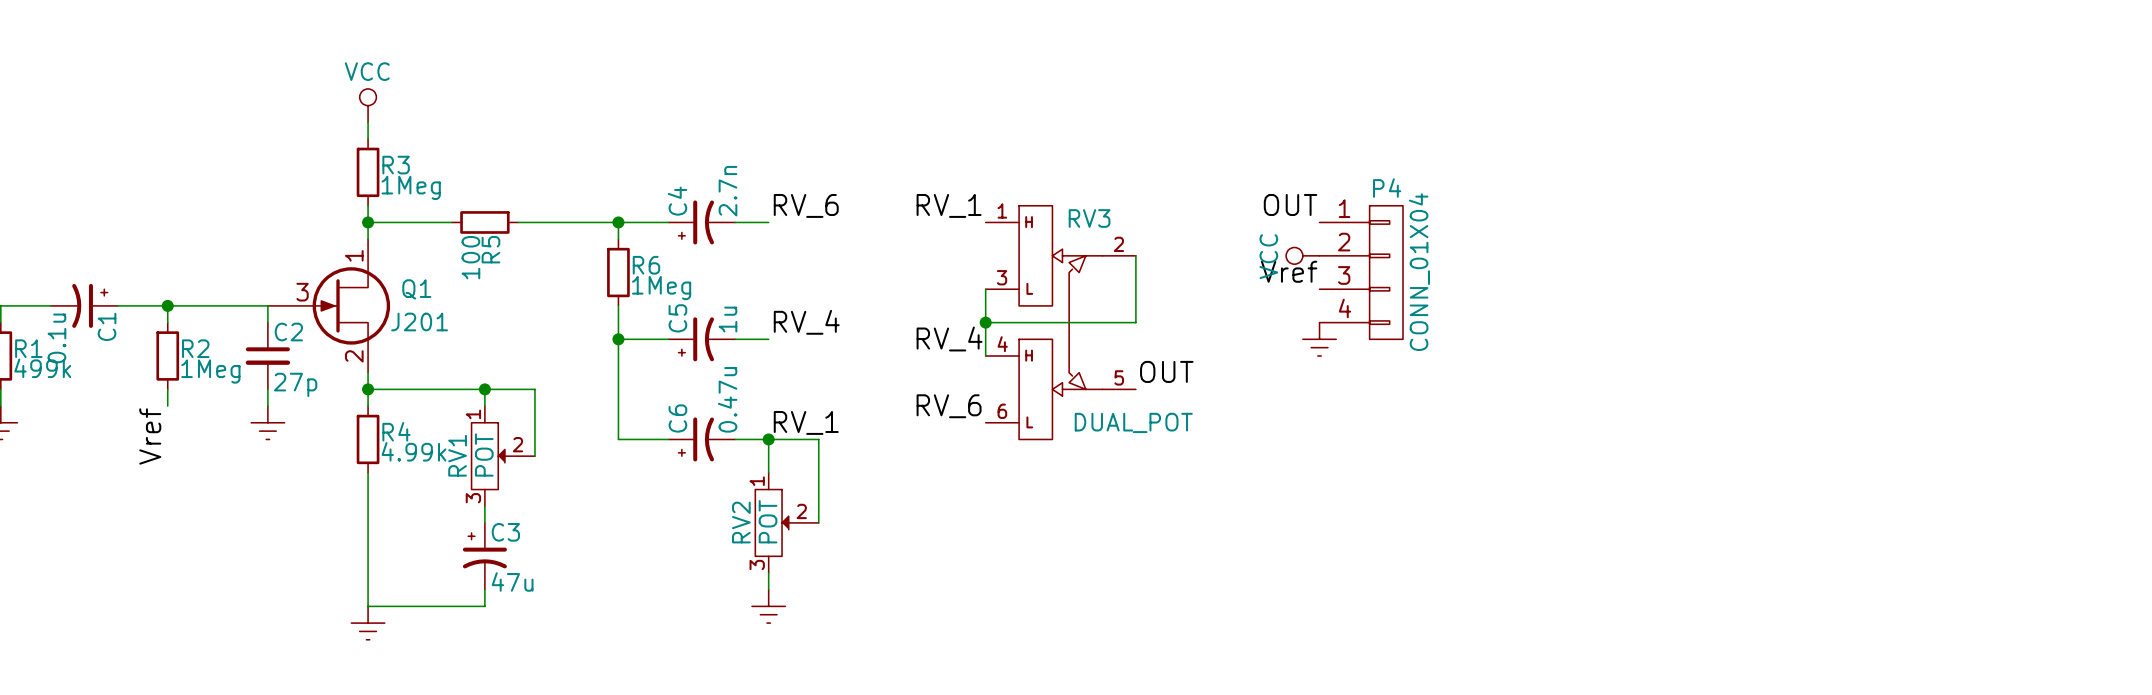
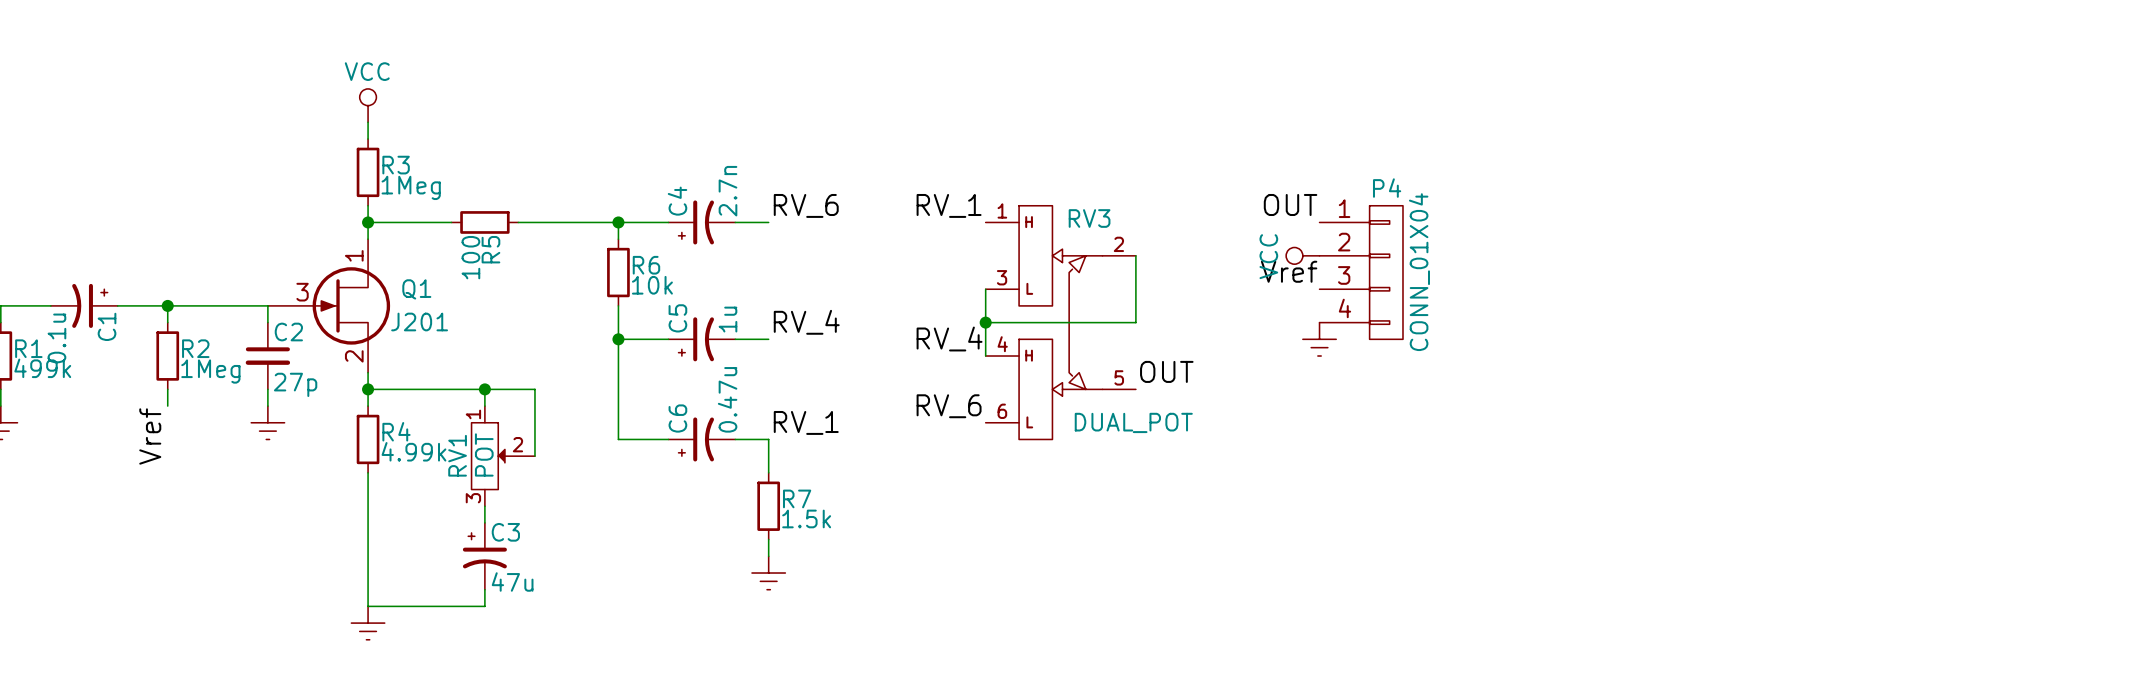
R6 value: 1Meg (661, 288) -> 10k (652, 285)
wire: (768, 439) (818, 439) (818, 522) -> none
junction: (768, 439) -> none
R7: none -> 1.5k (768, 506)
RV2: POT (787, 522) -> none
wire: (768, 573) (768, 589) -> (768, 539) (768, 556)
power symbol position: (768, 606) -> (768, 573)

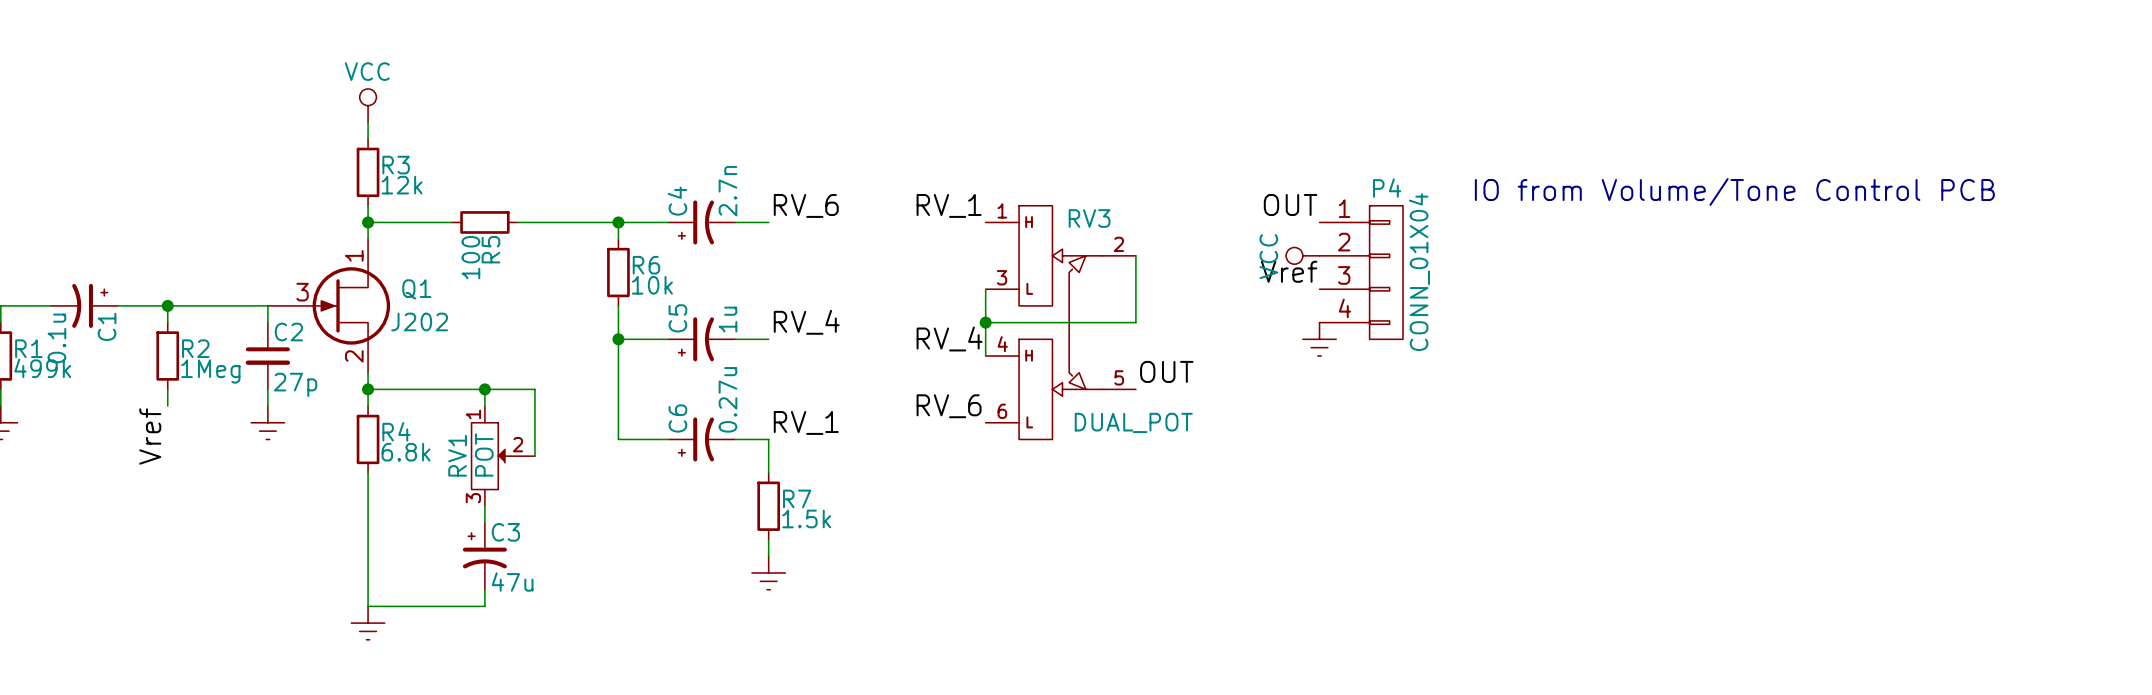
R3 value: 1Meg (411, 187) -> 12k (402, 185)
text: none -> IO from Volume/Tone Control PCB (1734, 191)
Q1 value: J201 (419, 321) -> J202 (419, 321)
C6 value: 0.47u (727, 399) -> 0.27u (727, 399)
R4 value: 4.99k (413, 451) -> 6.8k (406, 452)

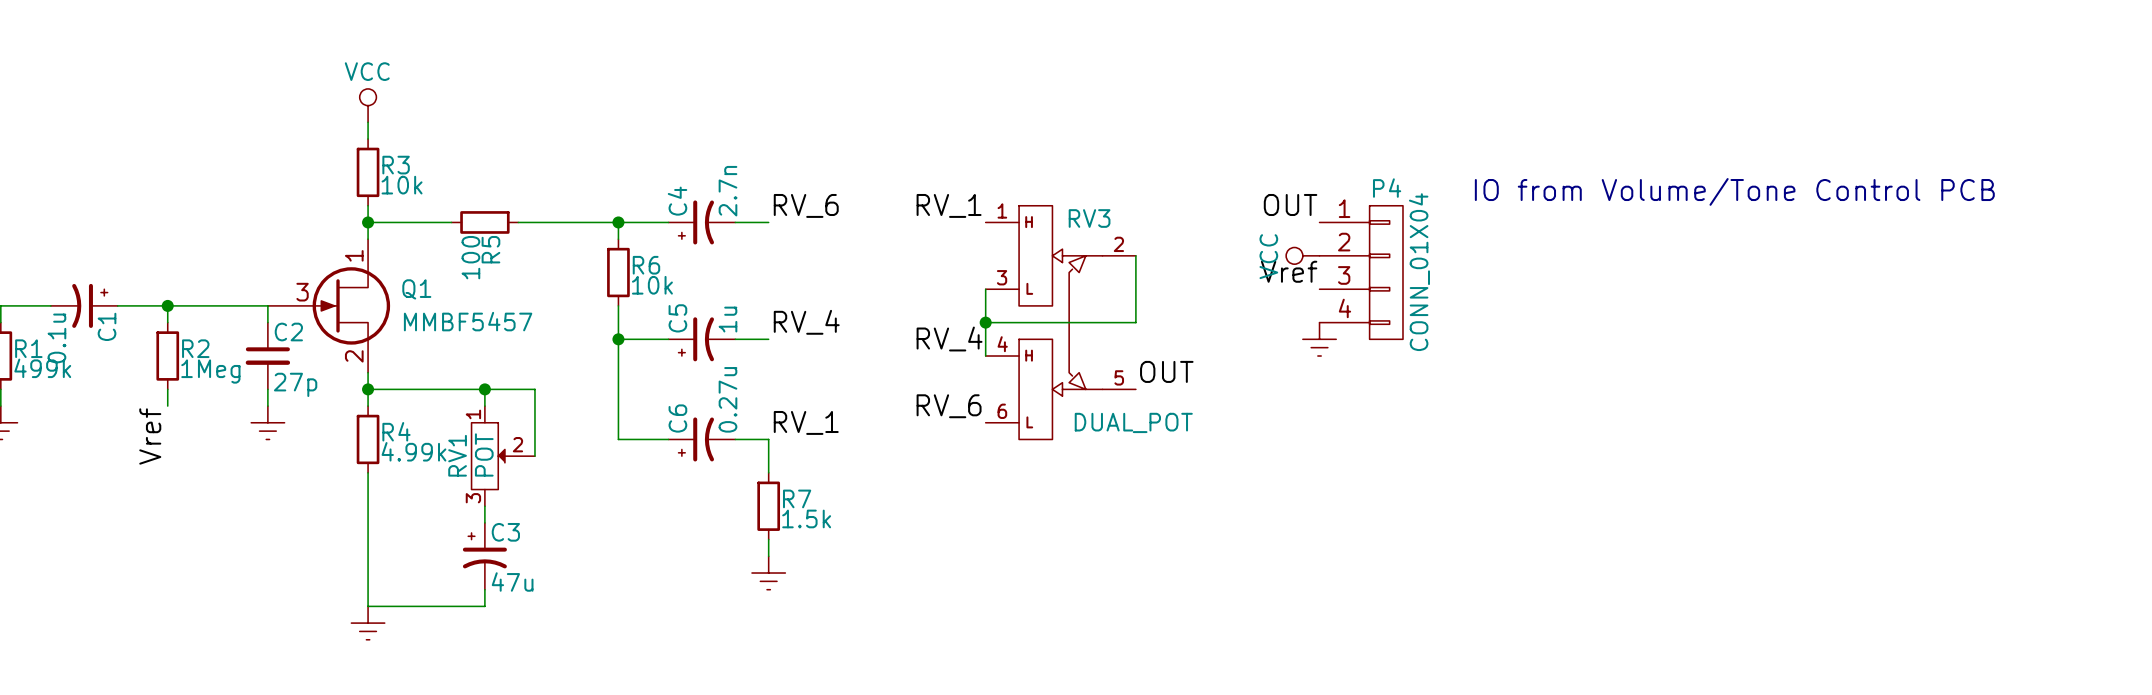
R3 value: 12k (402, 185) -> 10k (402, 185)
Q1 value: J202 (419, 321) -> MMBF5457 (468, 321)
R4 value: 6.8k (406, 452) -> 4.99k (413, 451)

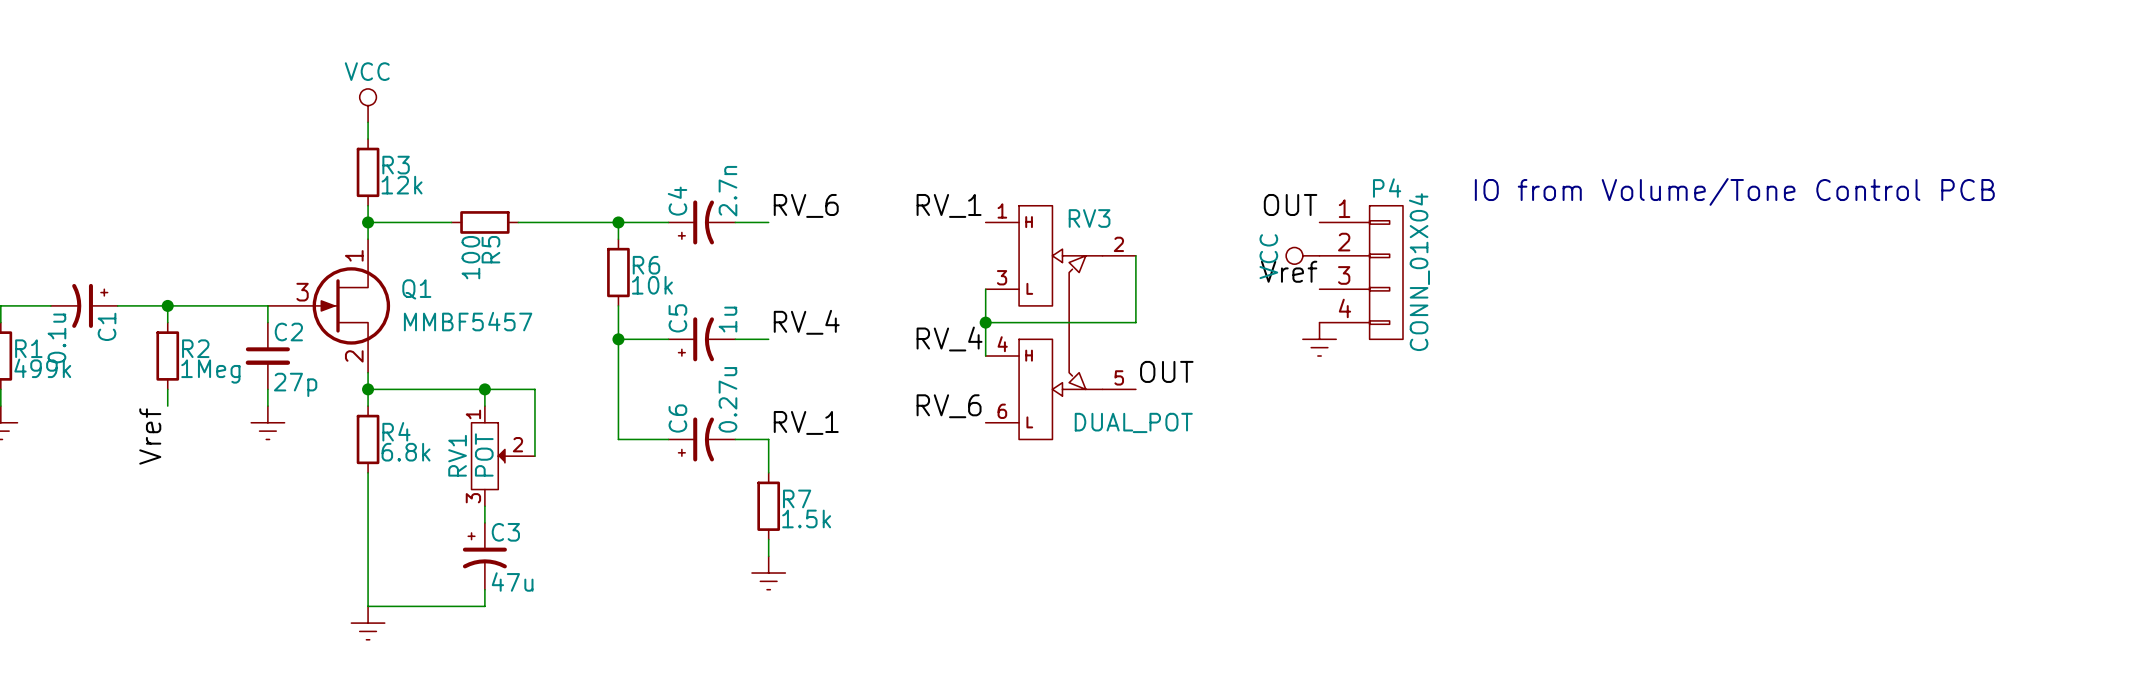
R3 value: 10k (402, 185) -> 12k (402, 185)
R4 value: 4.99k (413, 451) -> 6.8k (406, 452)

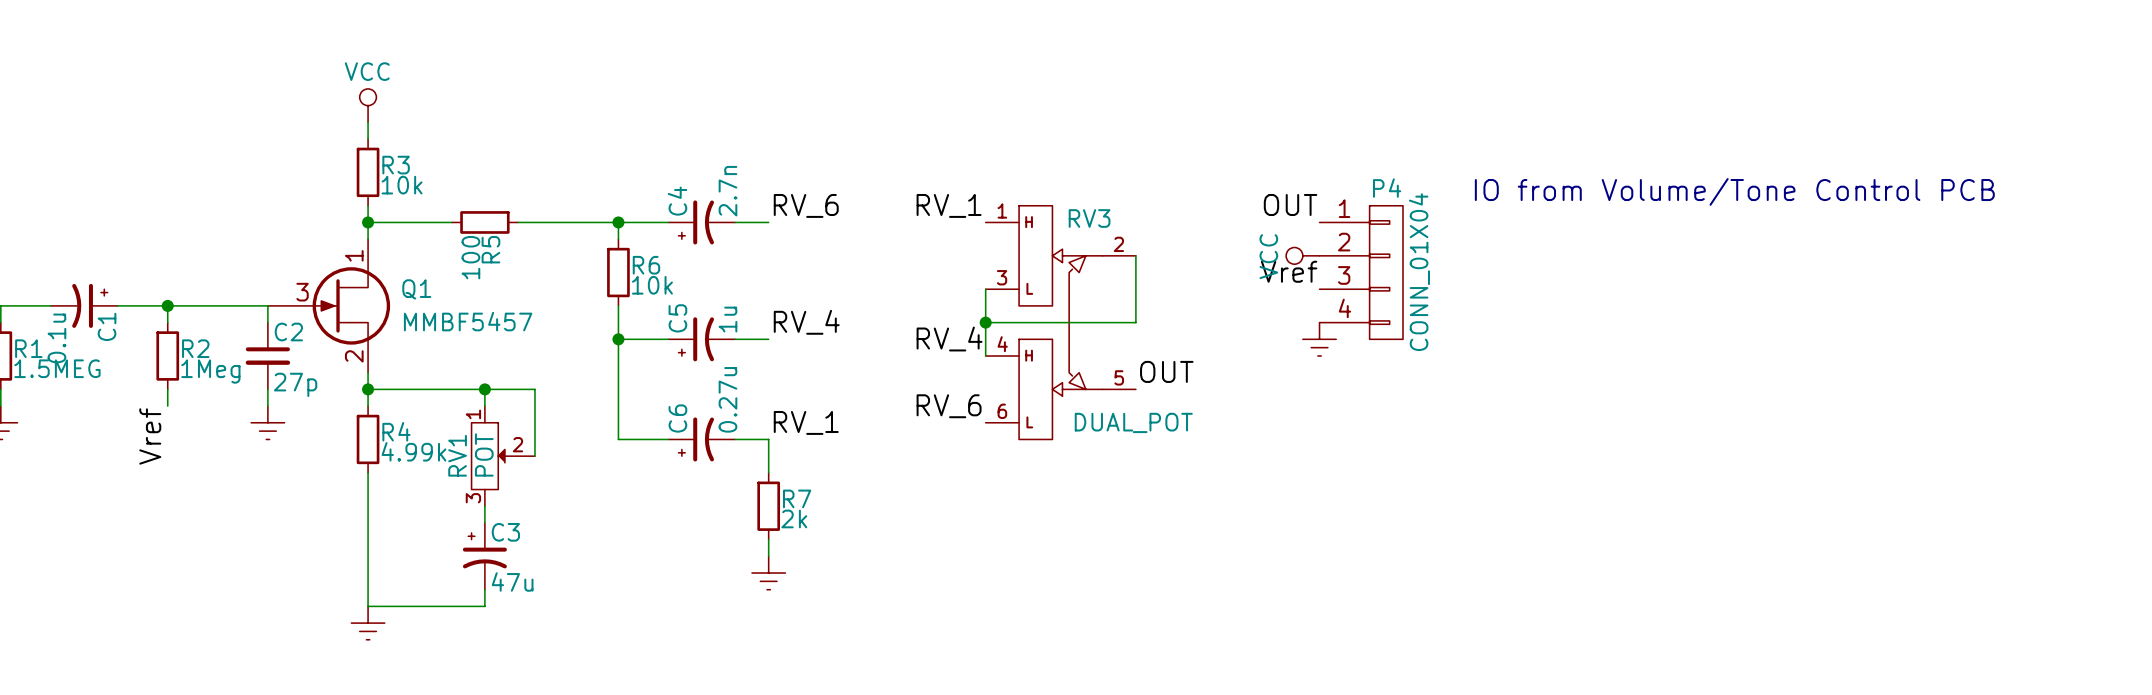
R3 value: 12k (402, 185) -> 10k (402, 185)
R1 value: 499k (42, 368) -> 1.5MEG (57, 368)
R4 value: 6.8k (406, 452) -> 4.99k (413, 451)
R7 value: 1.5k (806, 518) -> 2k (794, 518)

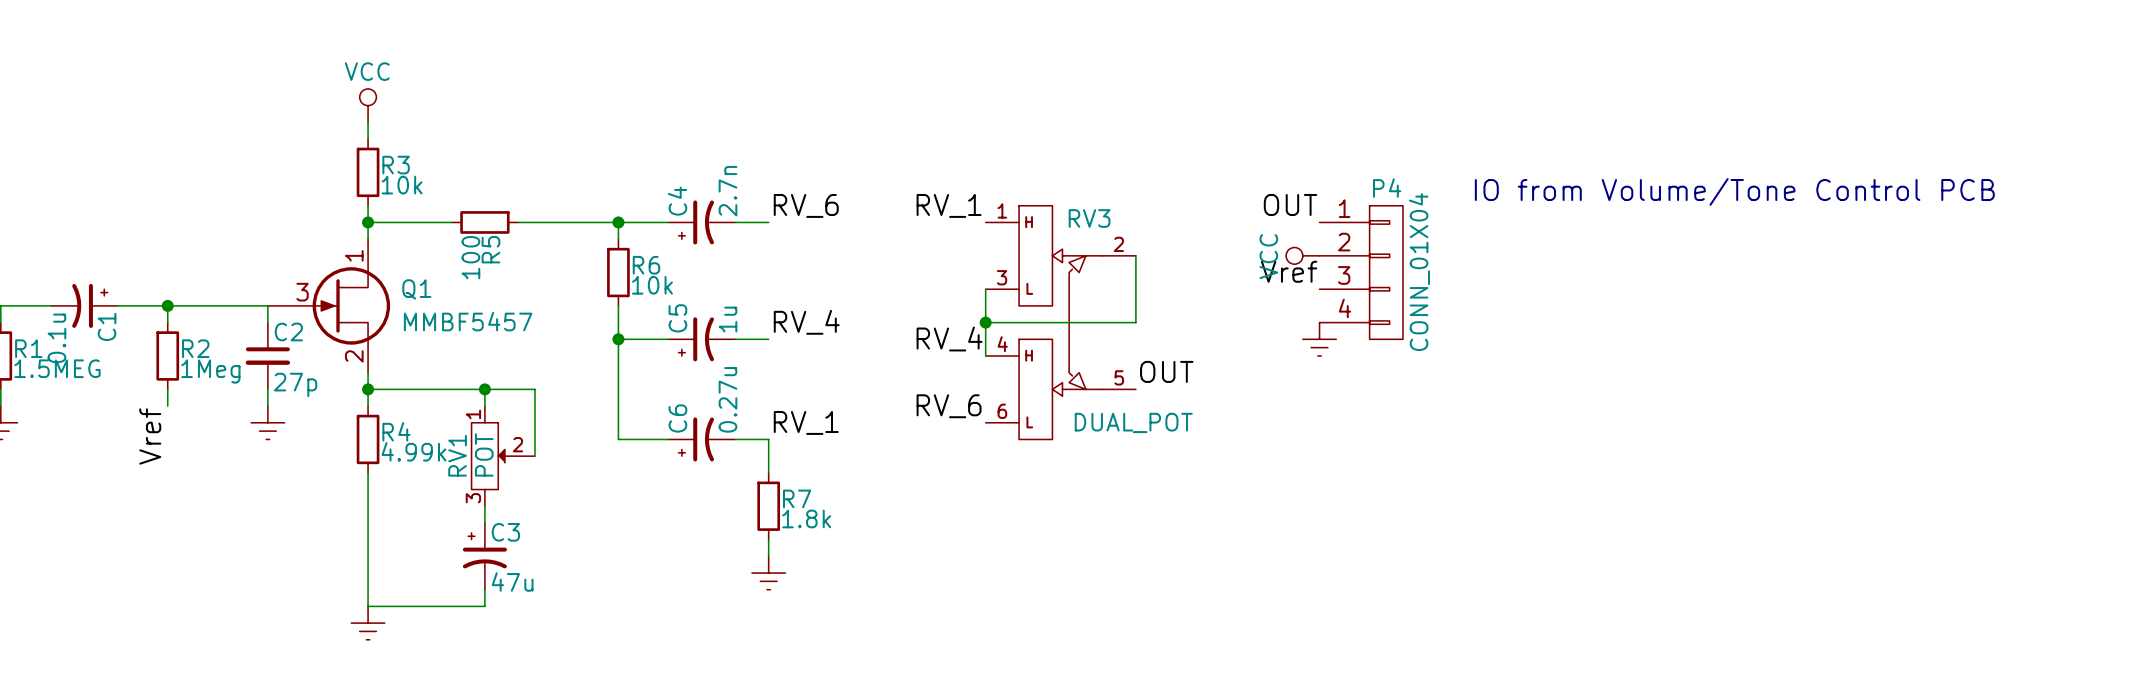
R7 value: 2k (794, 518) -> 1.8k (806, 518)

